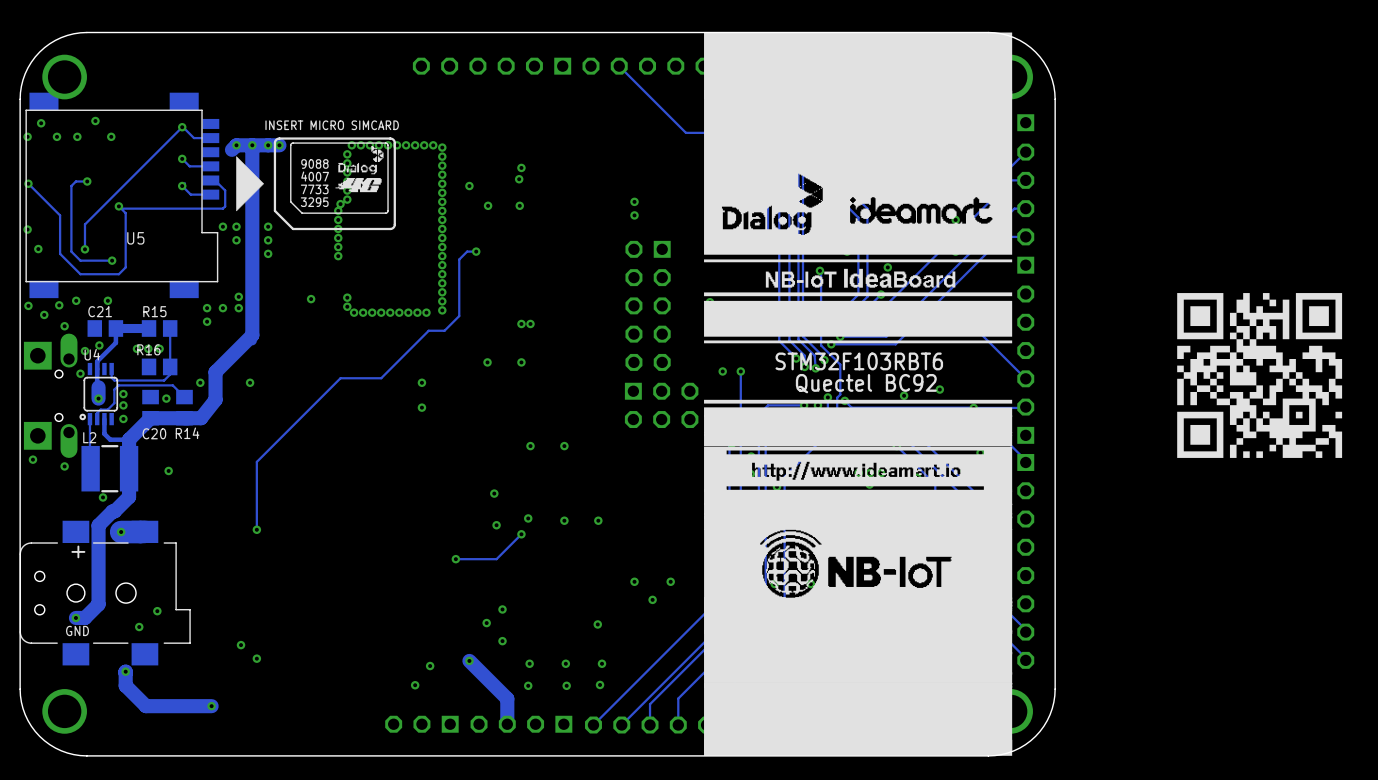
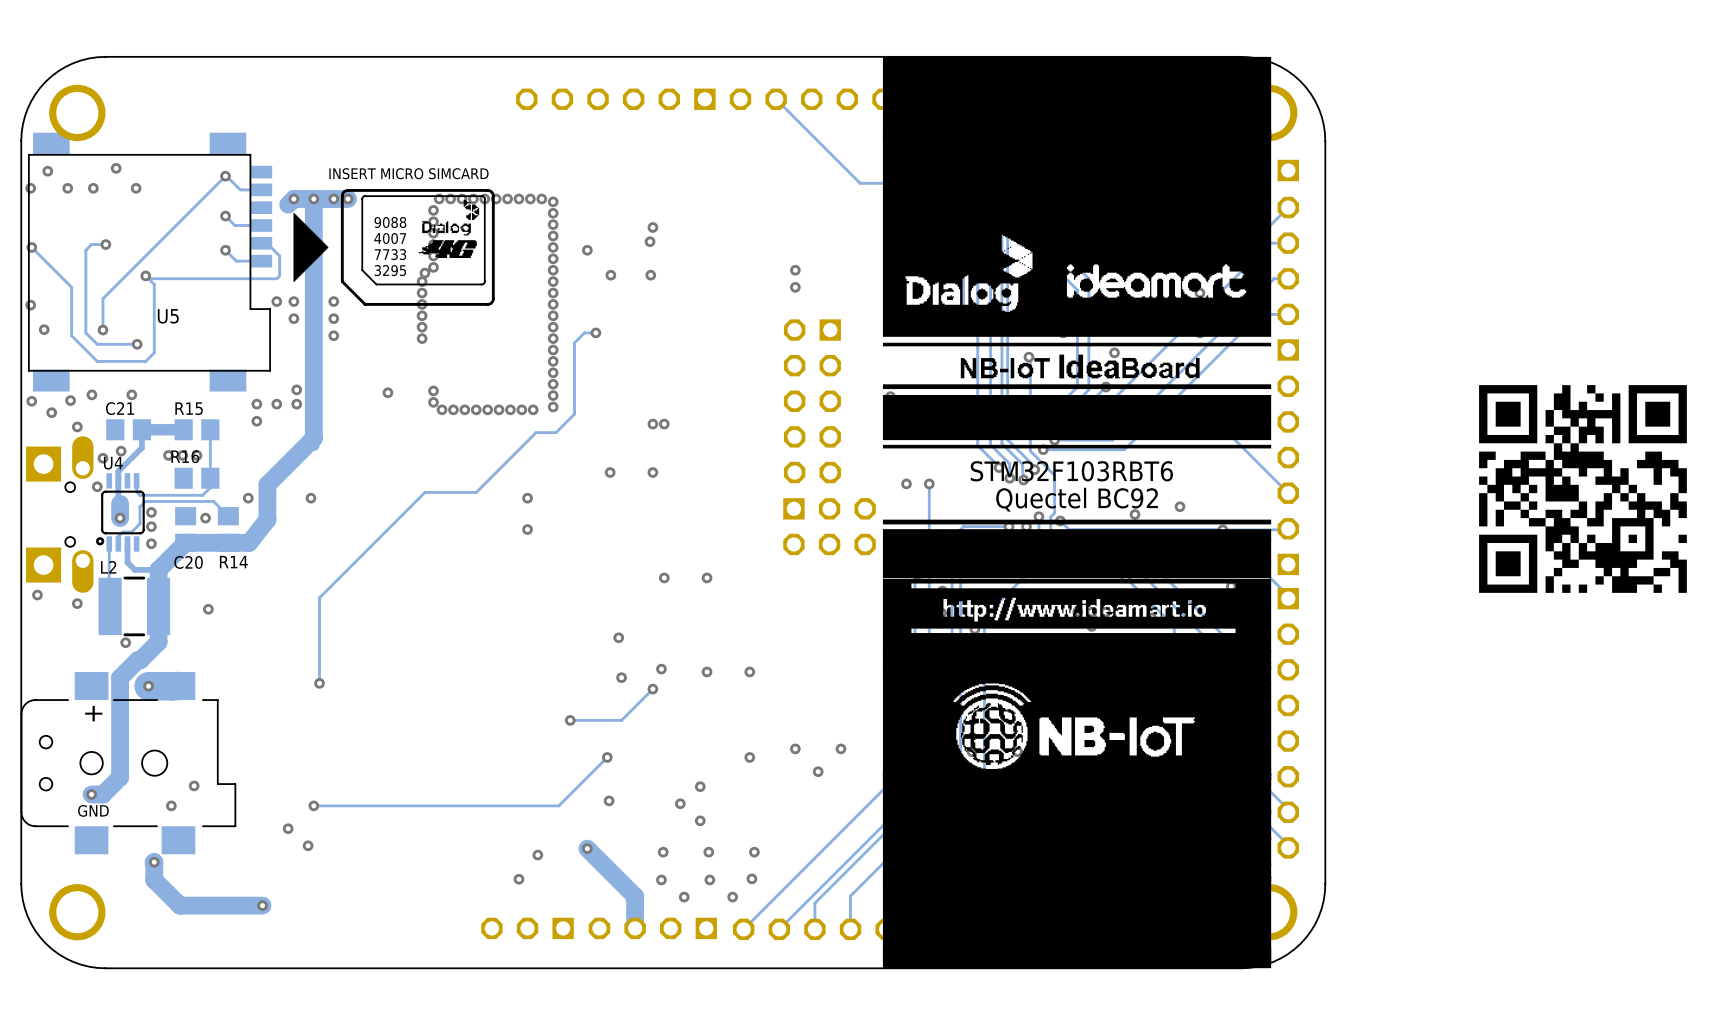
track: none -> (607, 757) (558, 805) (313, 805)
via: none -> (607, 757)
via: none -> (749, 757)
via: (502, 609) -> none
via: none -> (700, 786)
via: (597, 624) -> none
via: none -> (680, 803)
via: none -> (313, 805)
via: none -> (700, 820)
via: (502, 641) -> none
via: none -> (288, 828)
via: (241, 645) -> none
via: none -> (308, 845)
via: (256, 658) -> none
via: none -> (684, 897)
via: none -> (732, 897)

